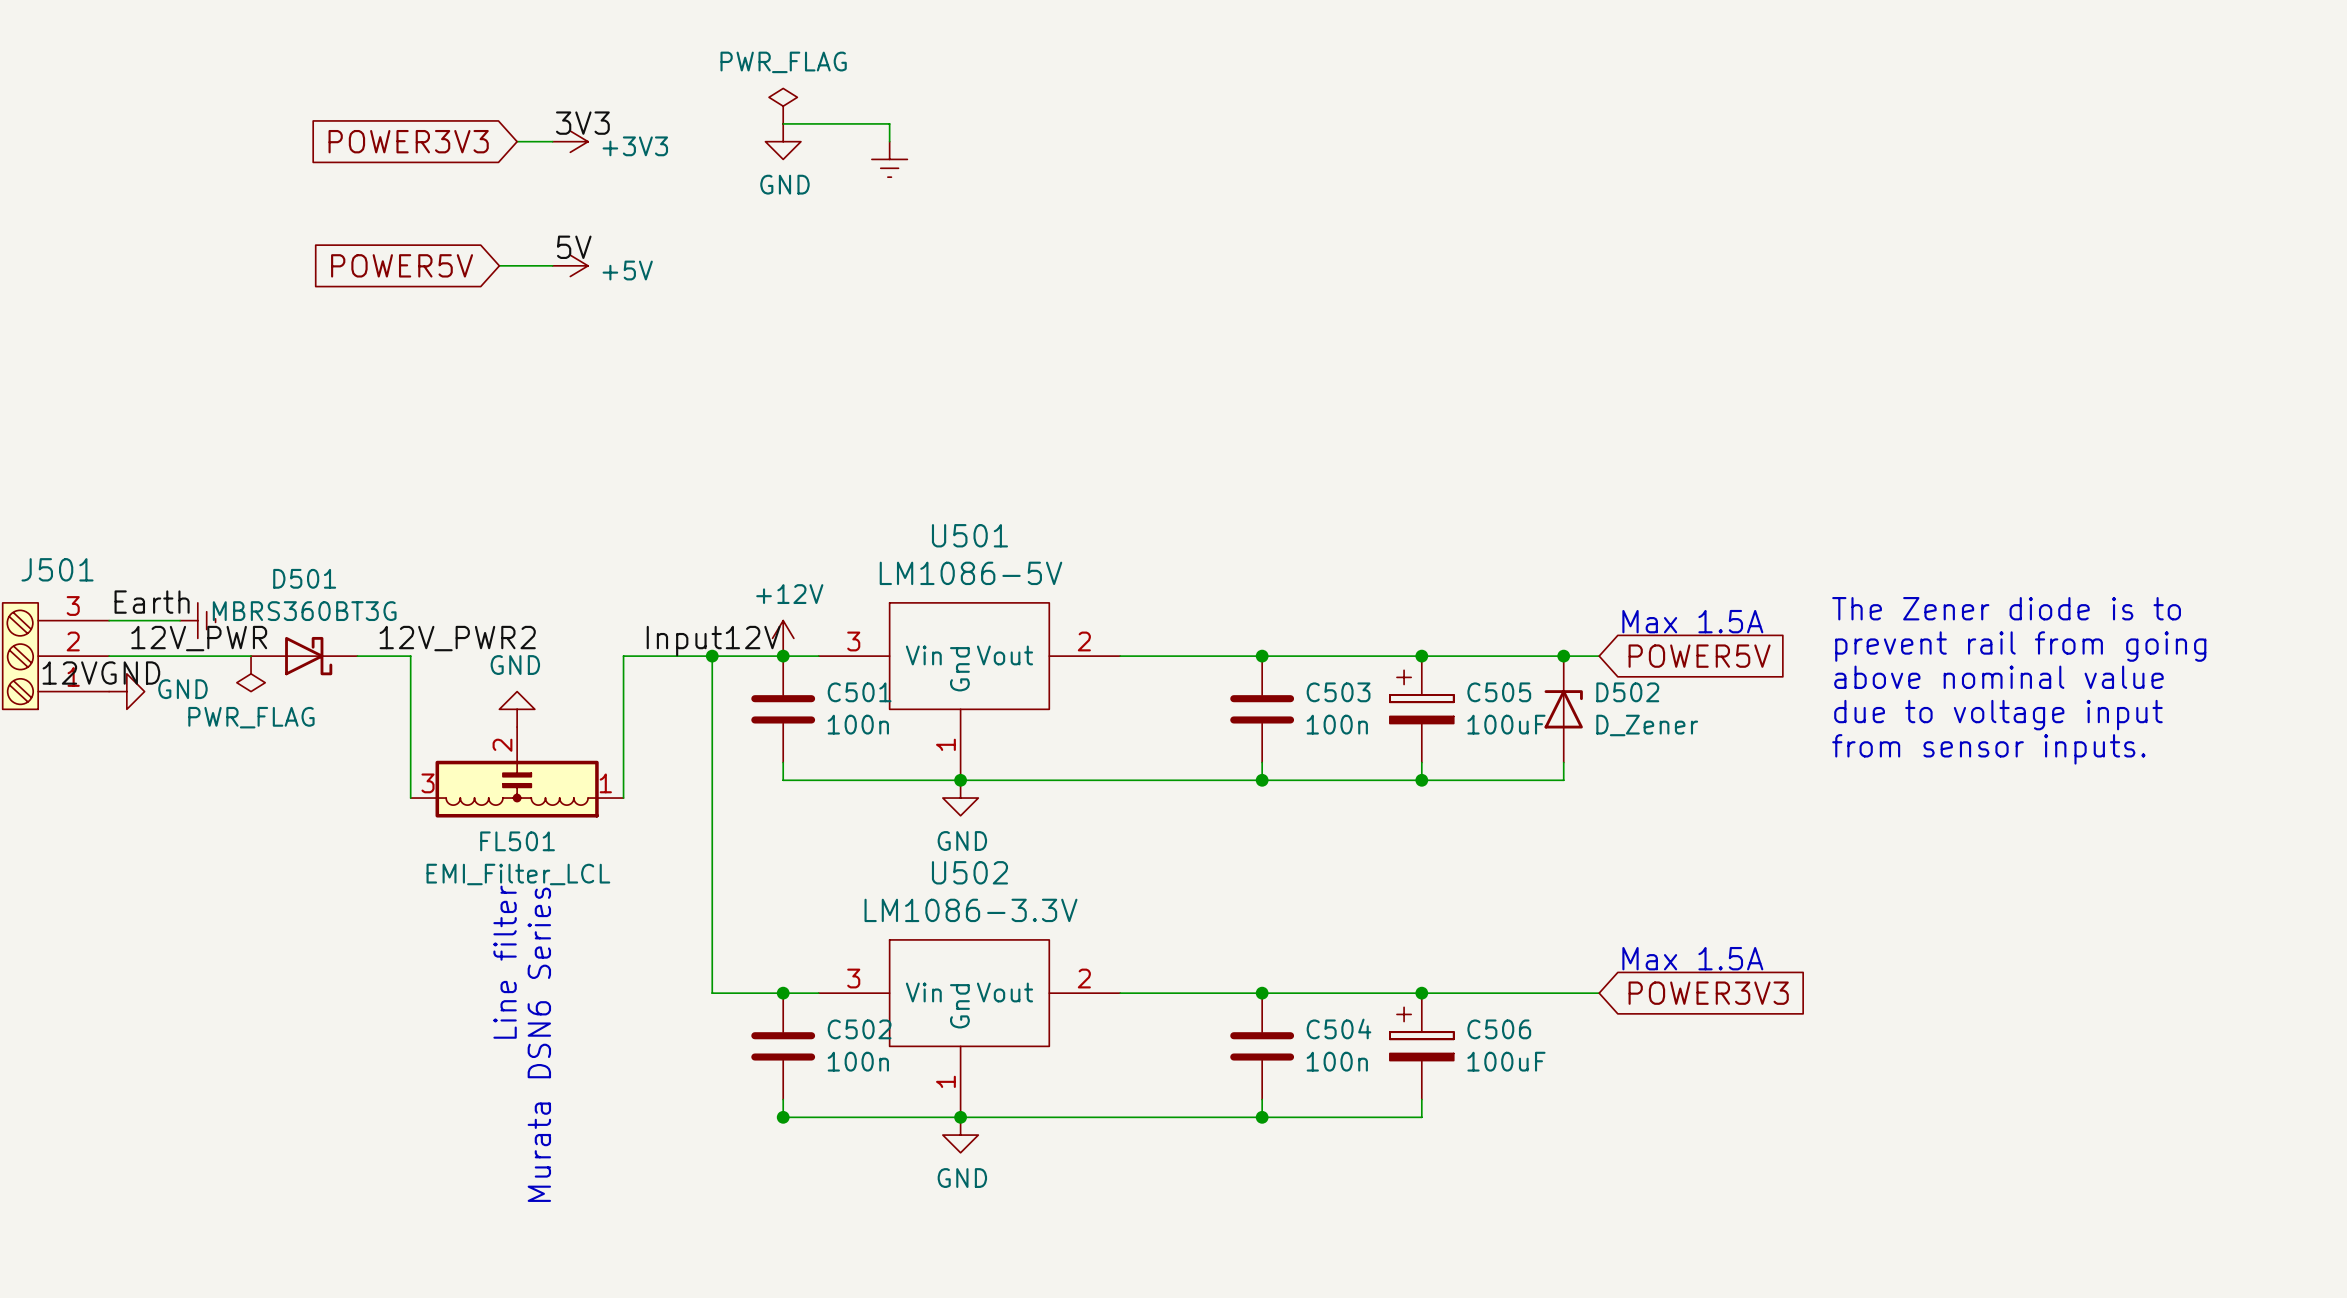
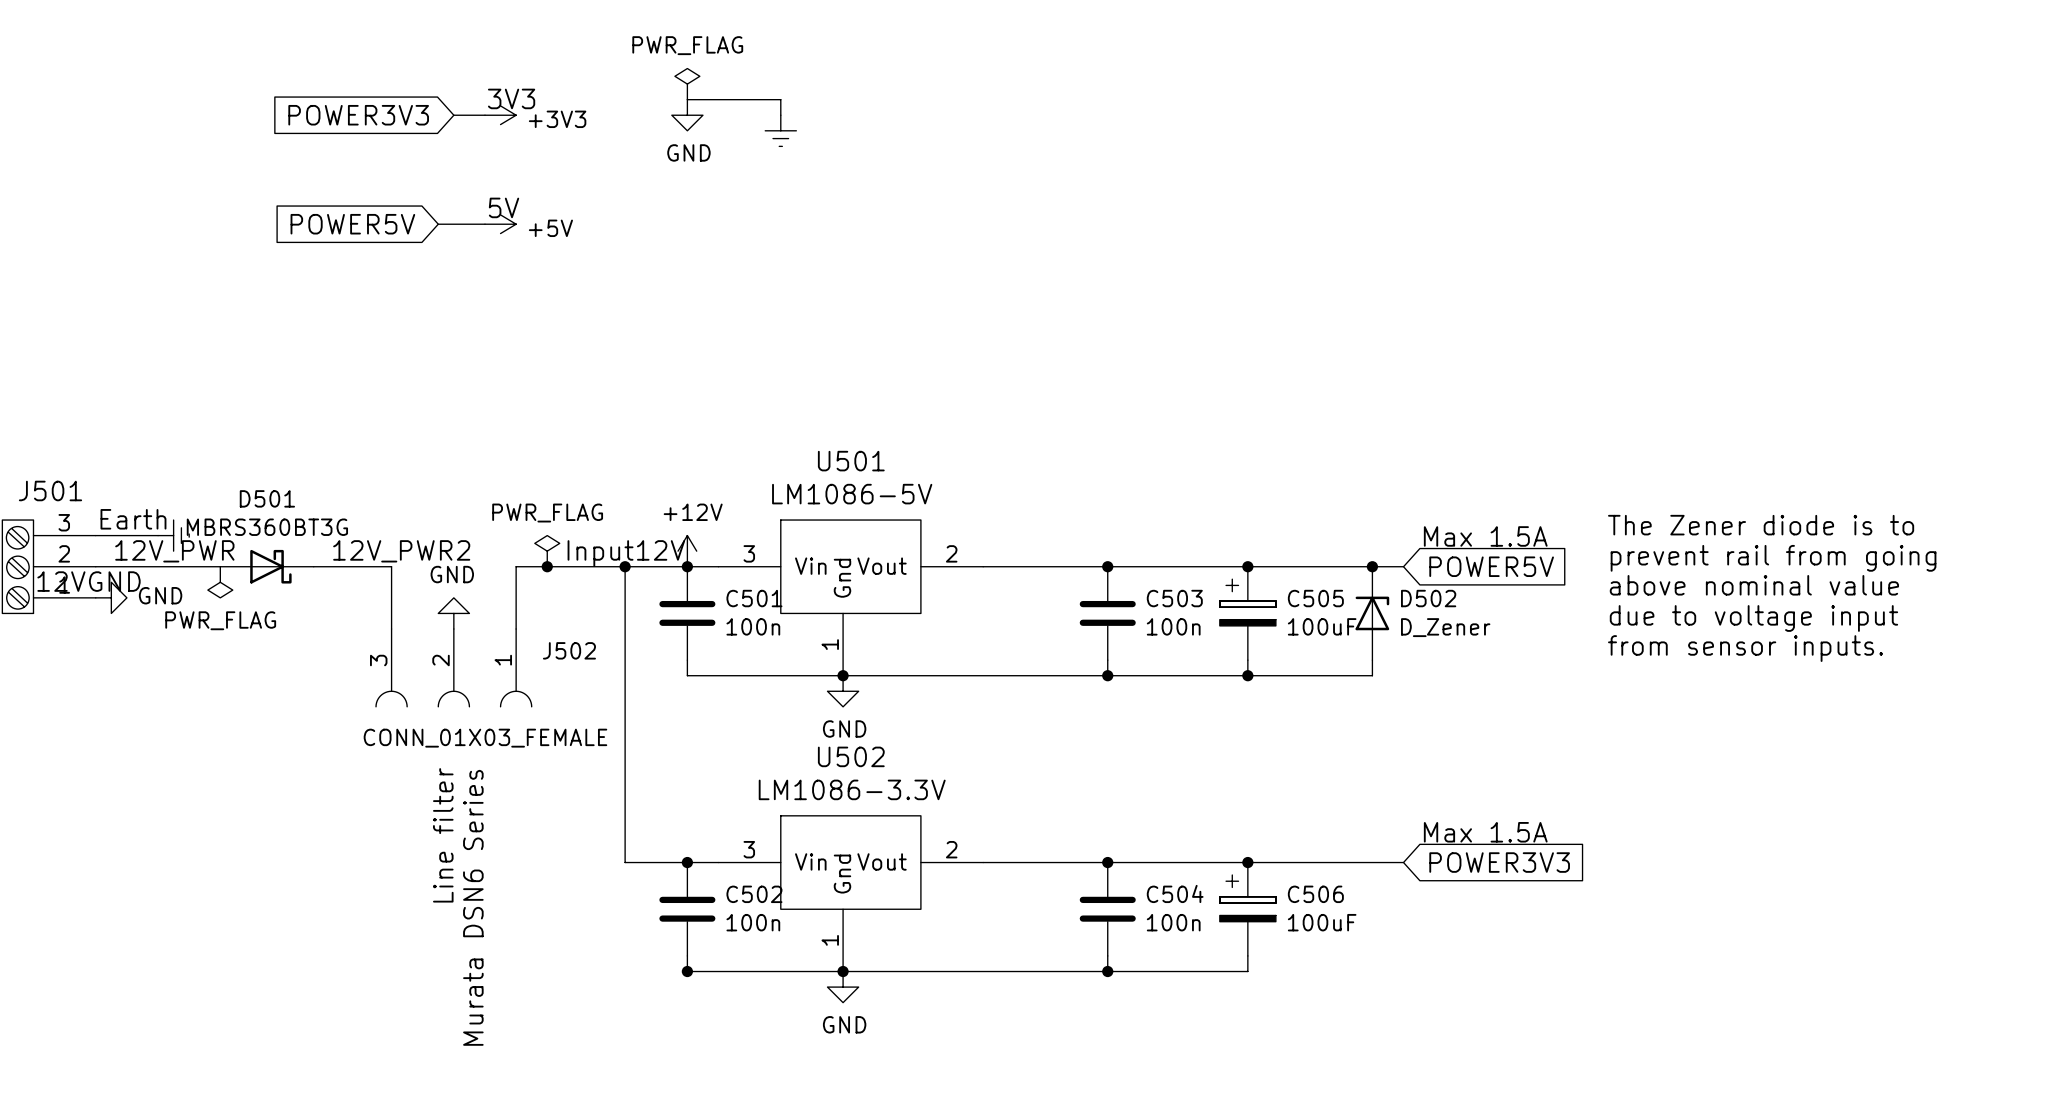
power symbol: none -> PWR_FLAG (547, 551)
wire: (410, 656) (410, 798) -> (360, 566) (391, 566) (391, 629)
wire: (623, 656) (623, 798) -> (547, 566) (516, 566) (516, 629)
junction: none -> (547, 566)
J502: none -> CONN_01X03_FEMALE (453, 667)
FL501: EMI_Filter_LCL (517, 772) -> none

